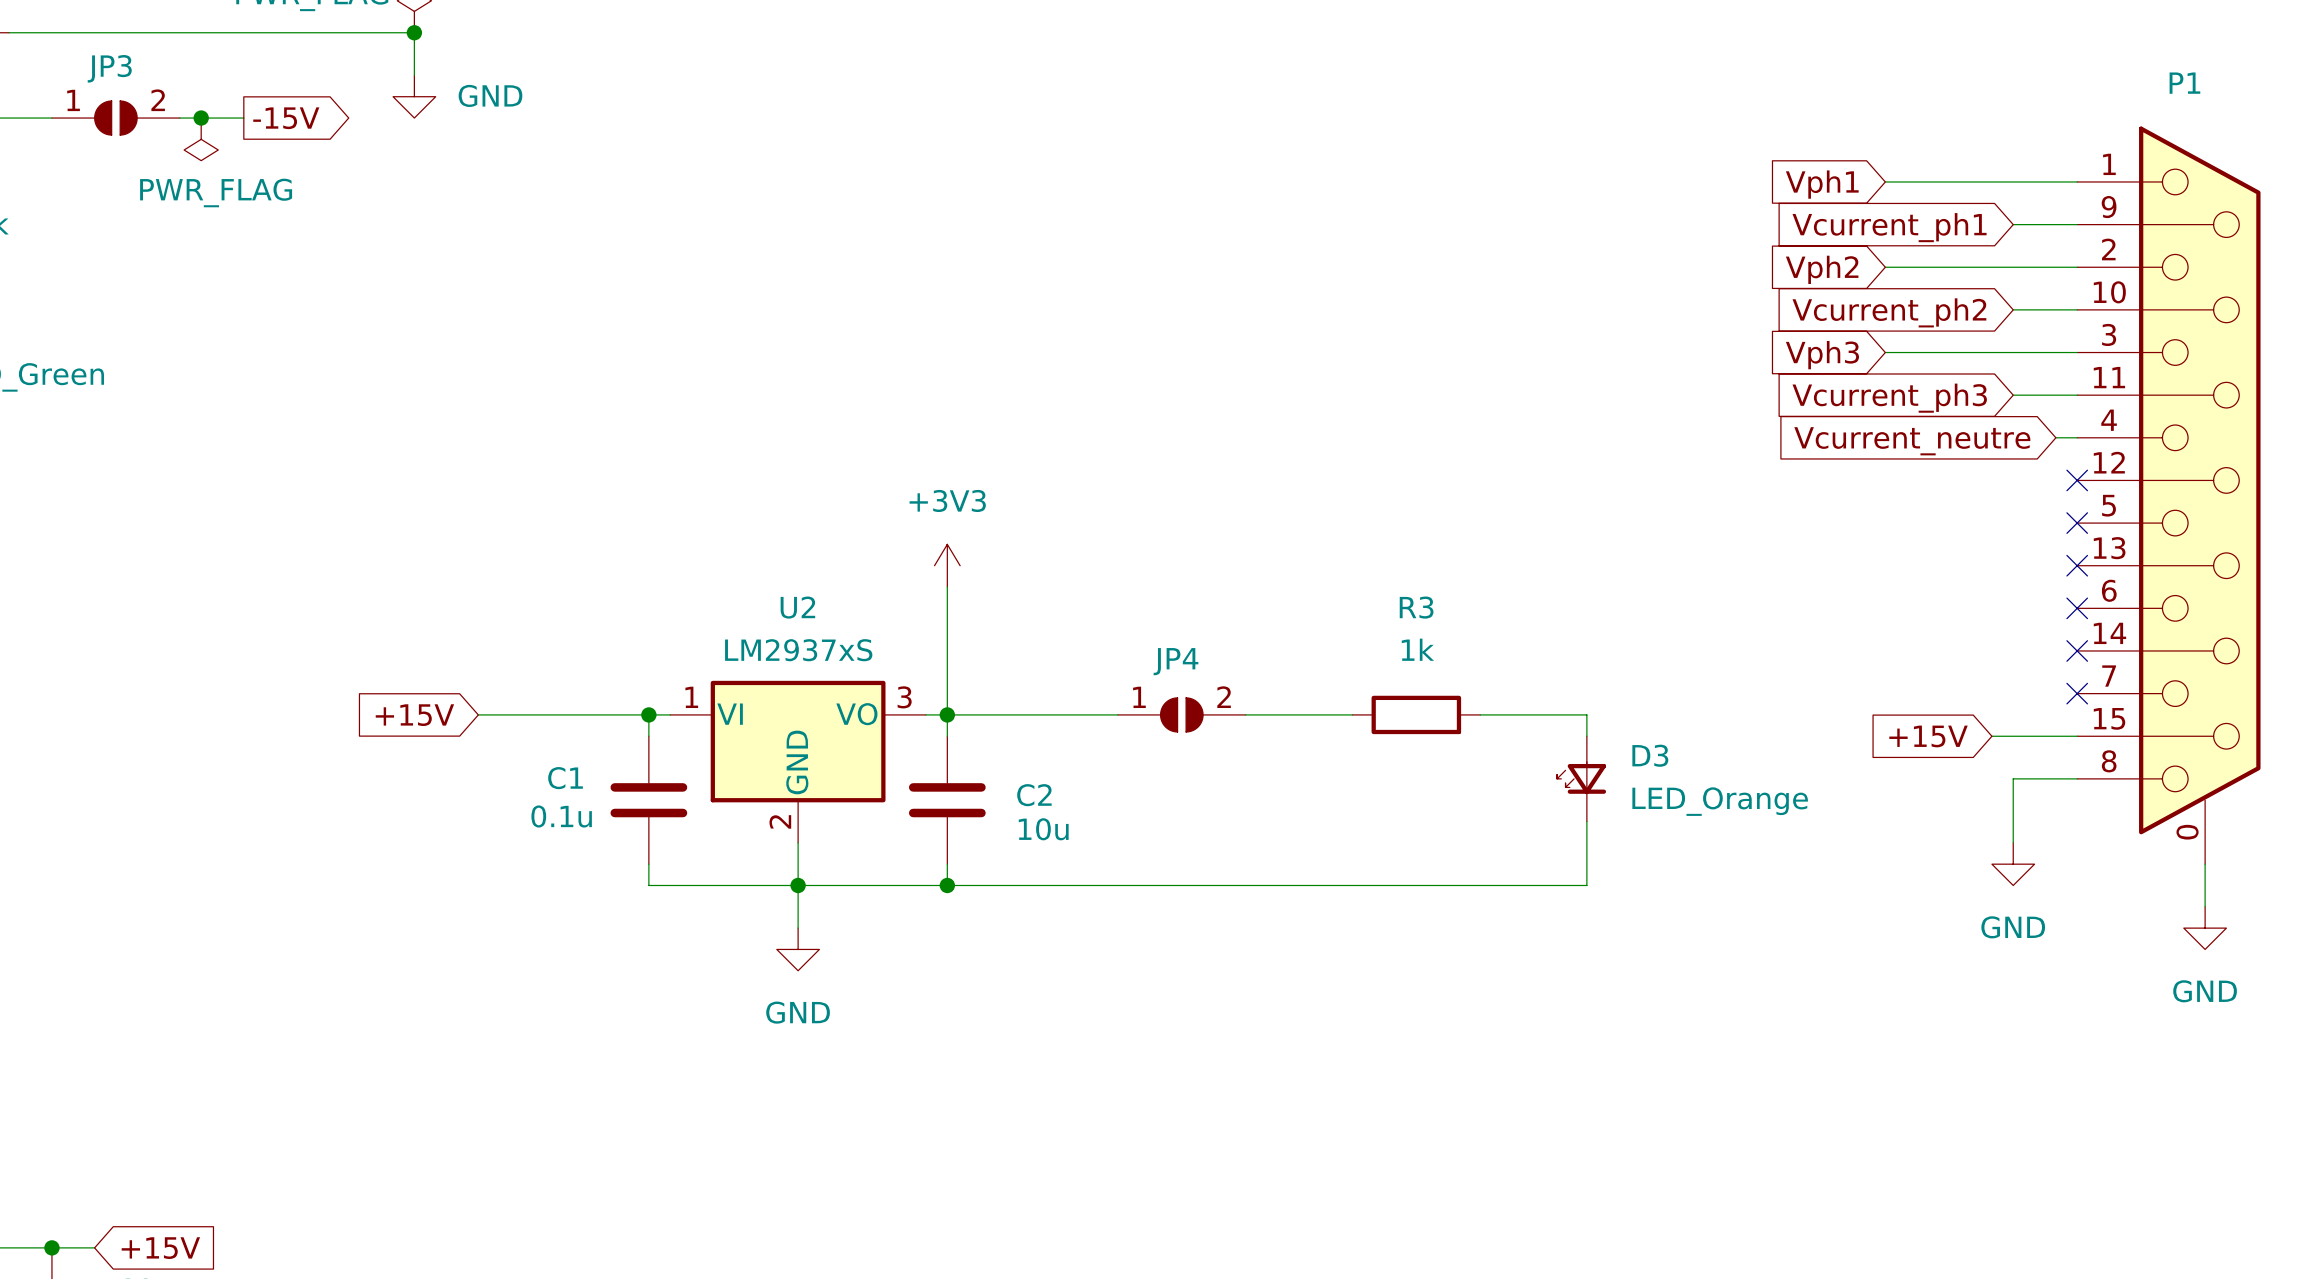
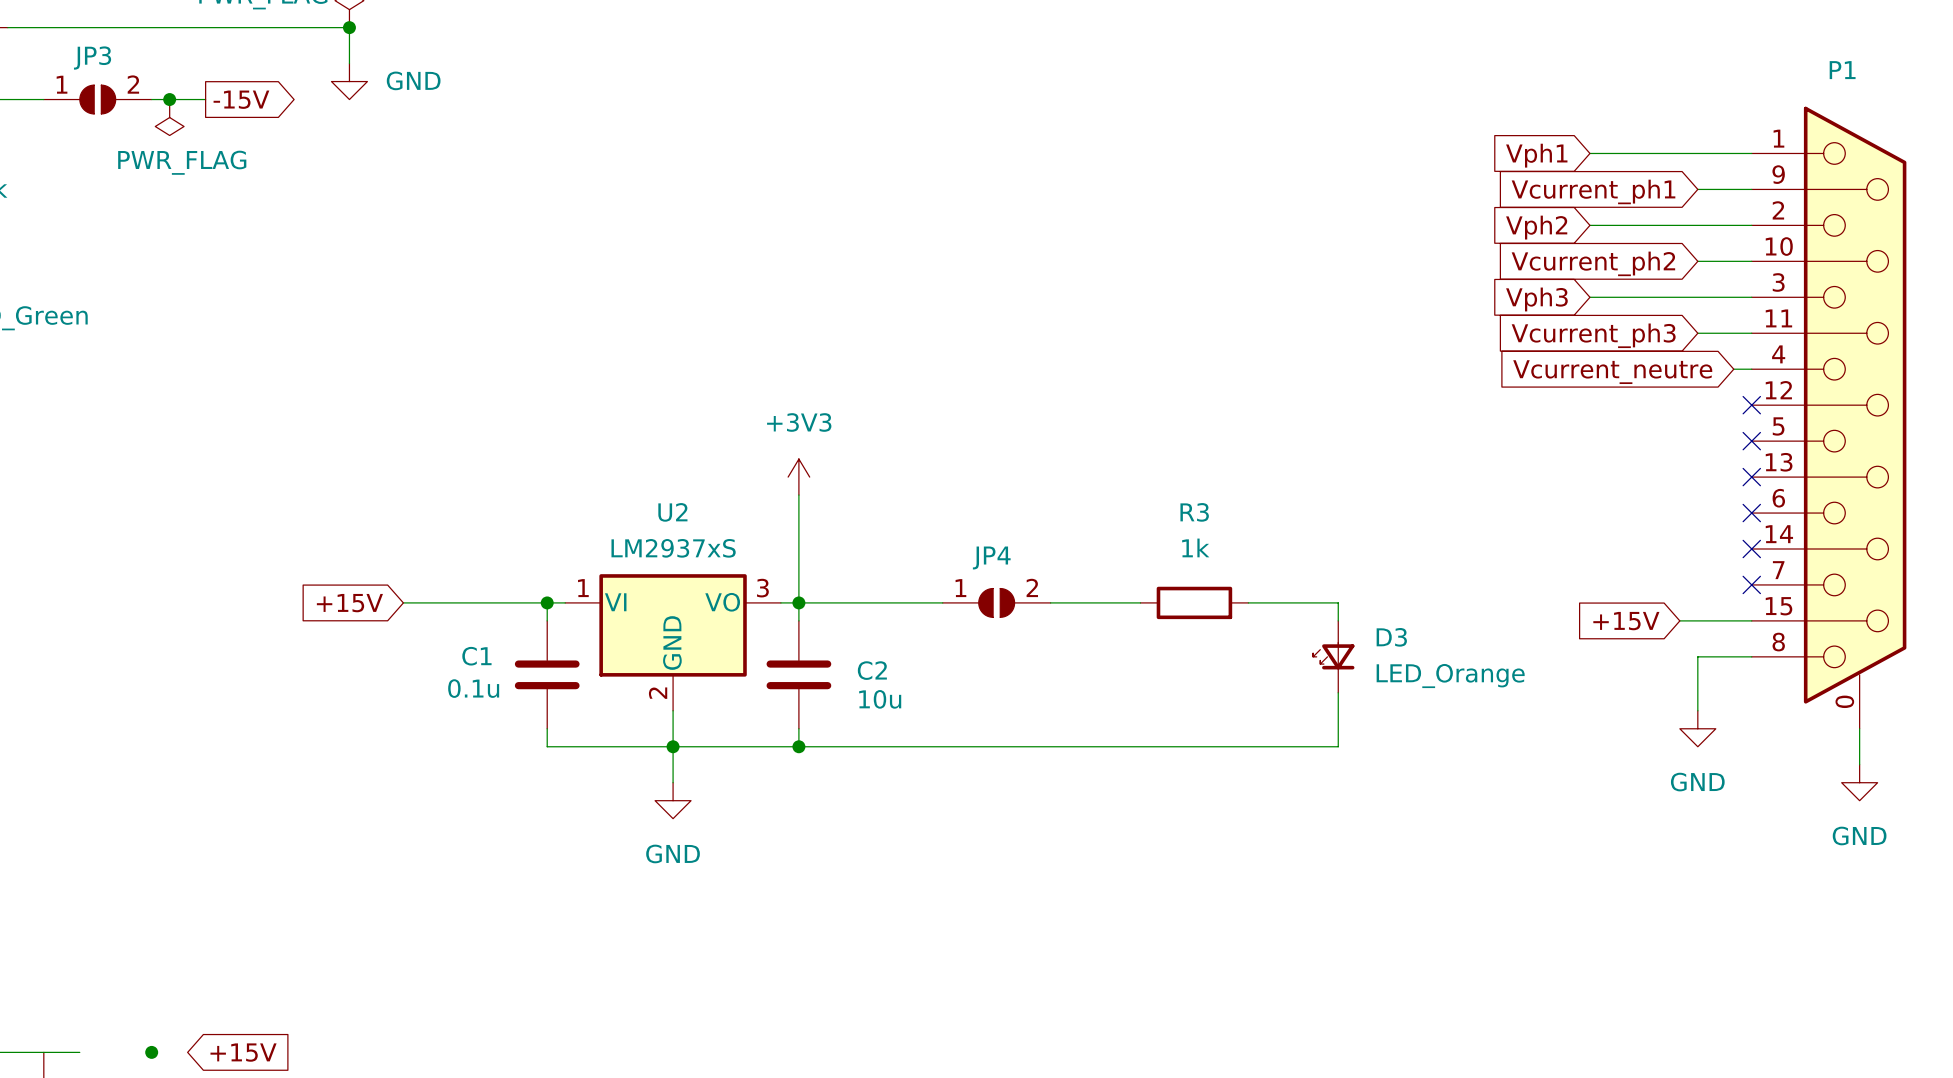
junction: (51, 1247) -> none
junction: none -> (151, 1052)
global label position: +15V (160, 1248) -> +15V (243, 1052)

